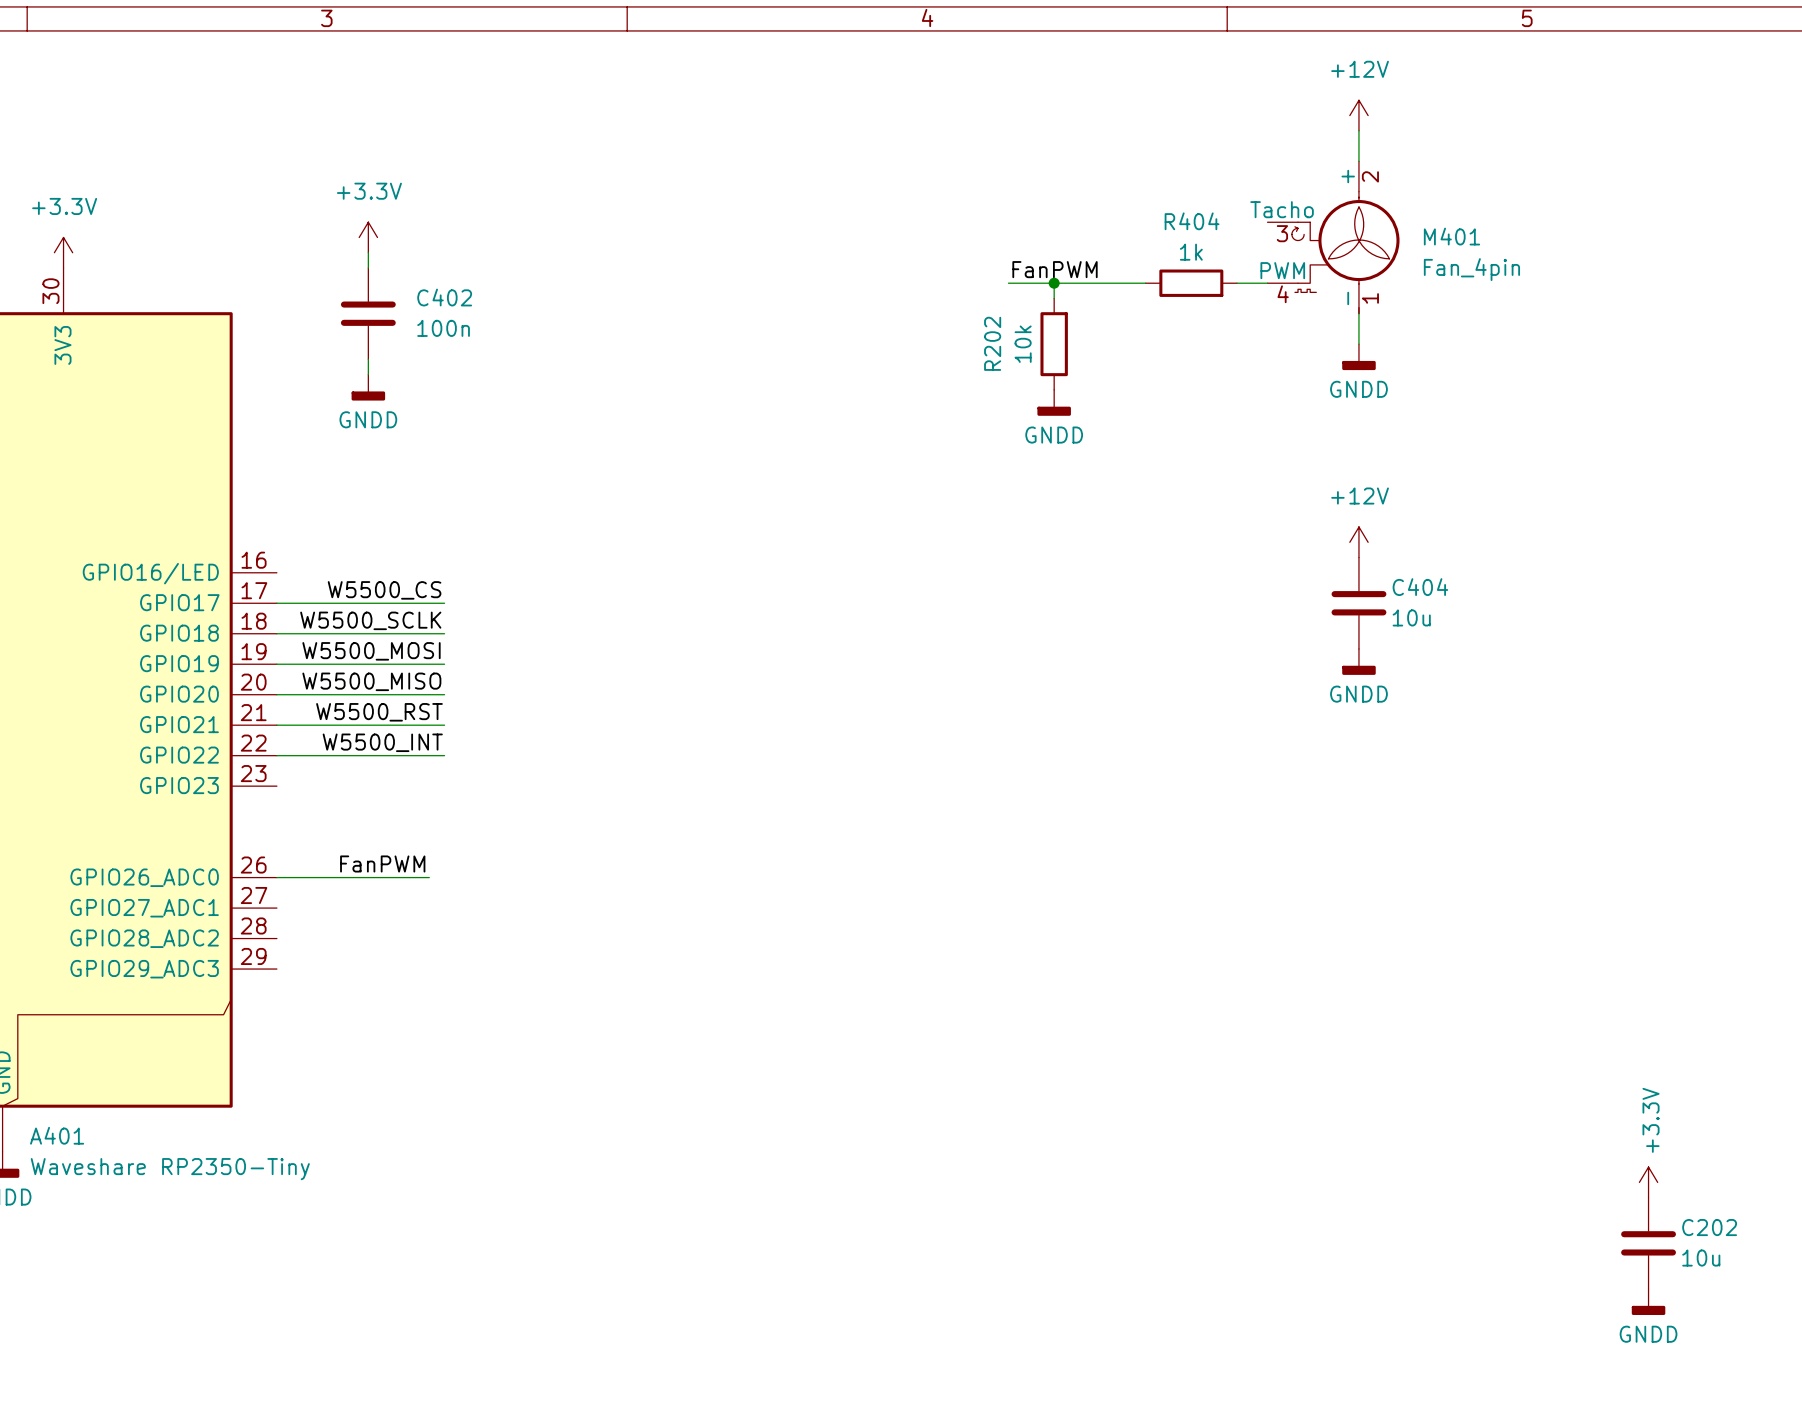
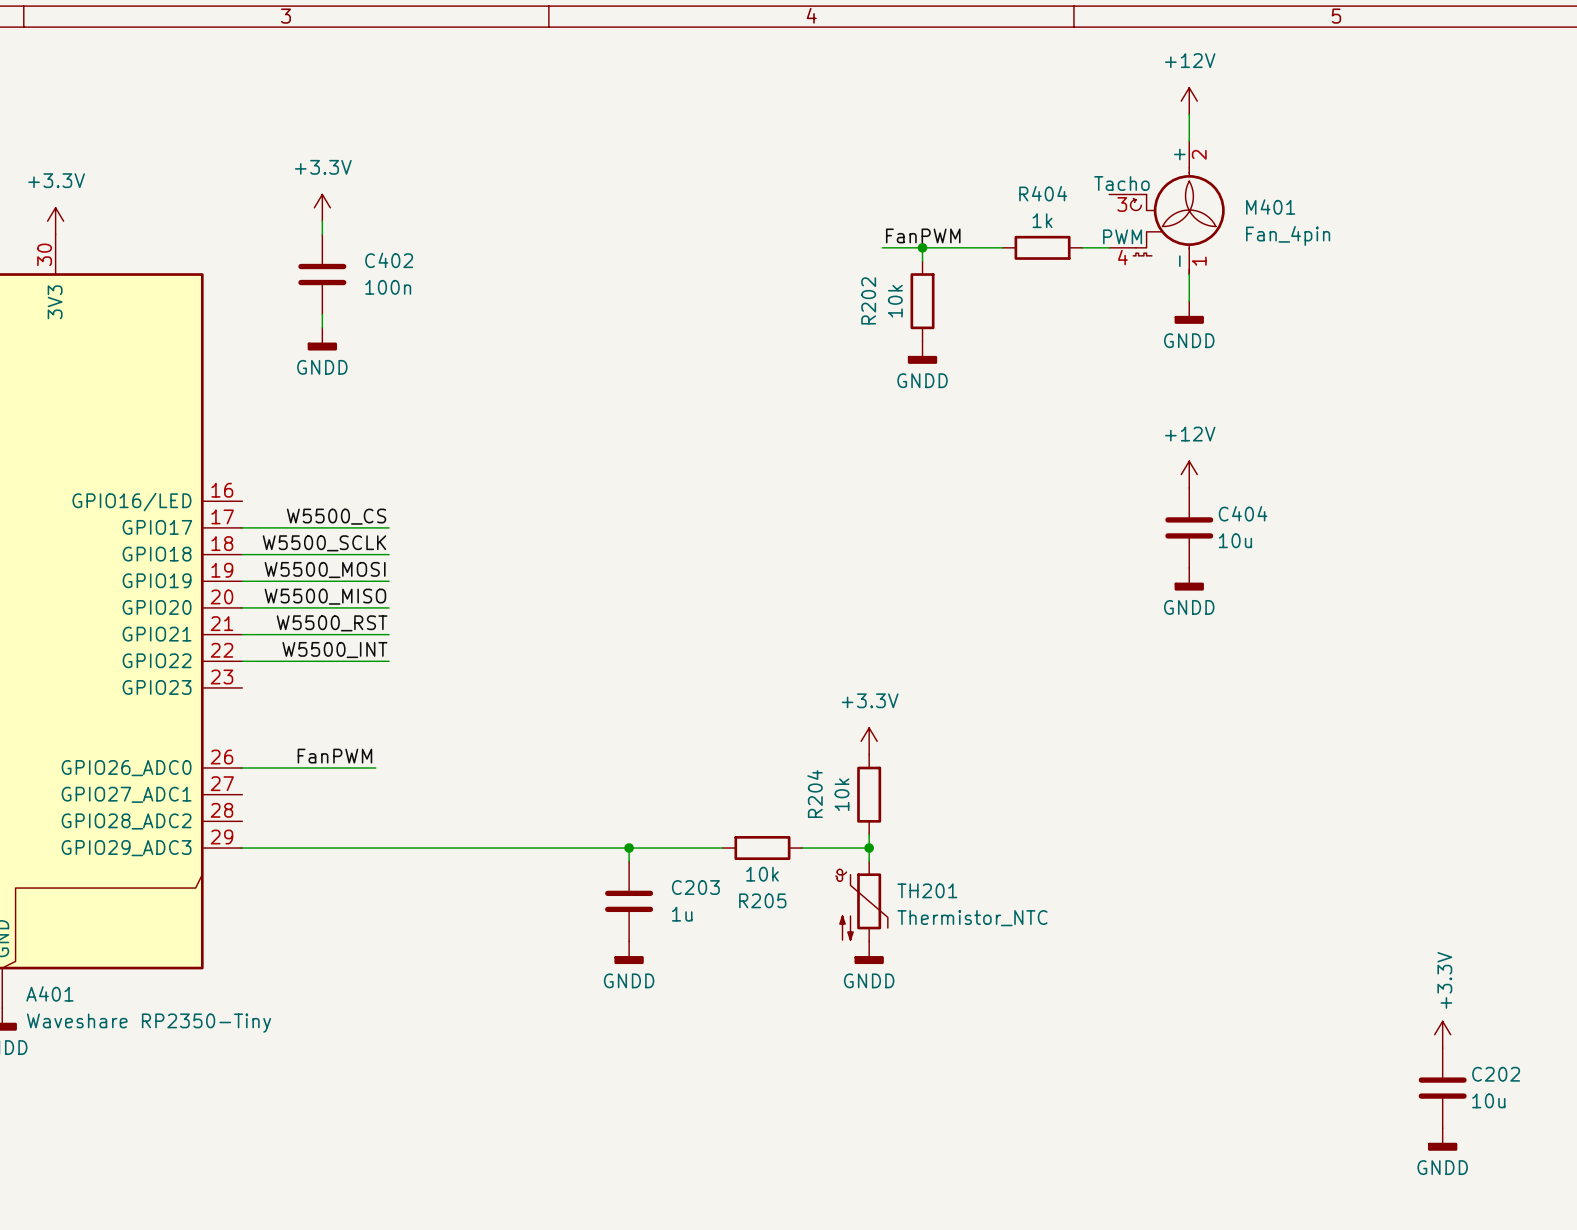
power symbol: none -> +3.3V (869, 741)
R204: none -> 10k (869, 794)
wire: none -> (869, 834) (869, 861)
wire: none -> (242, 848) (722, 848)
wire: none -> (629, 848) (629, 861)
junction: none -> (629, 848)
R205: none -> 10k (762, 848)
wire: none -> (802, 848) (869, 848)
junction: none -> (869, 848)
C203: none -> 1u (629, 901)
TH201: none -> Thermistor_NTC (861, 901)
power symbol: none -> GNDD (629, 952)
power symbol: none -> GNDD (869, 952)

